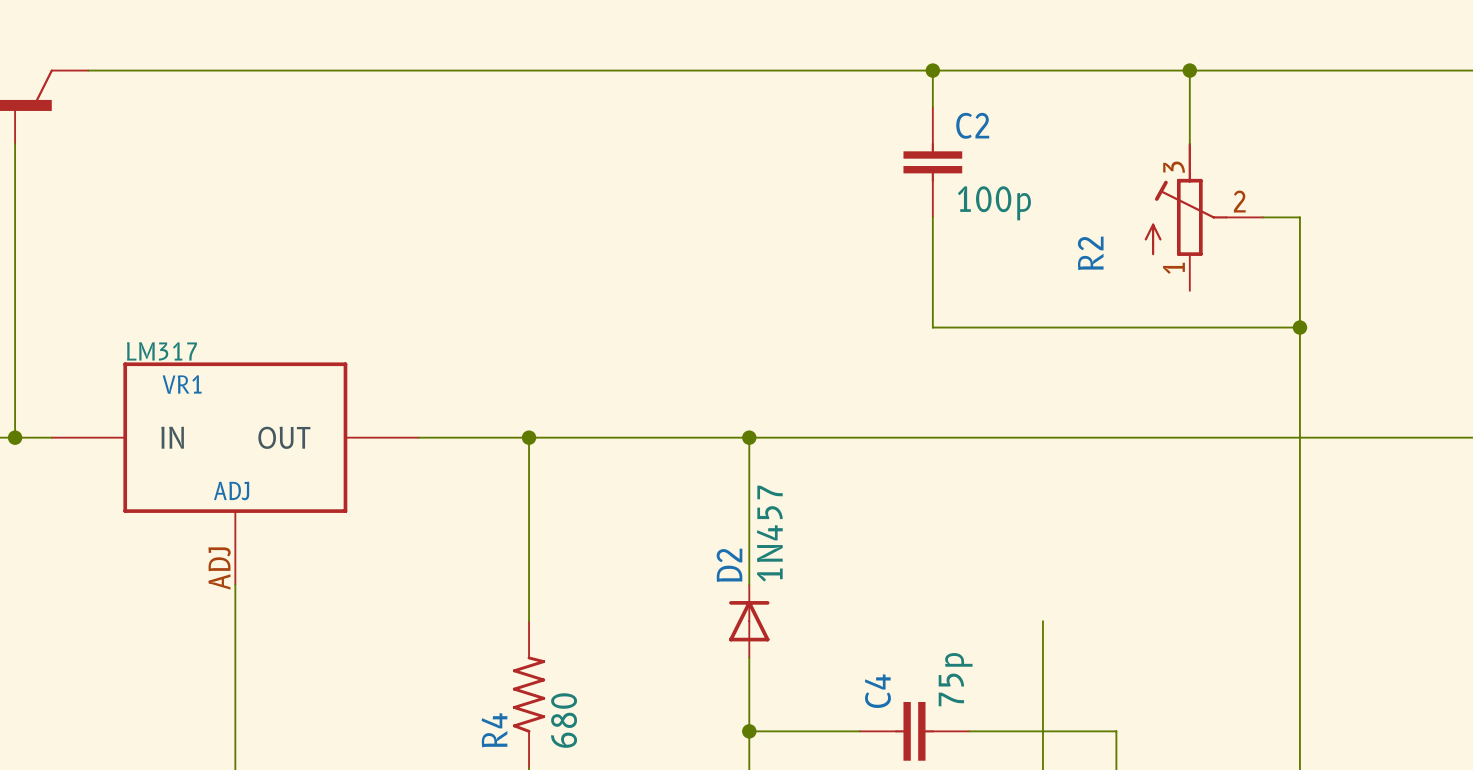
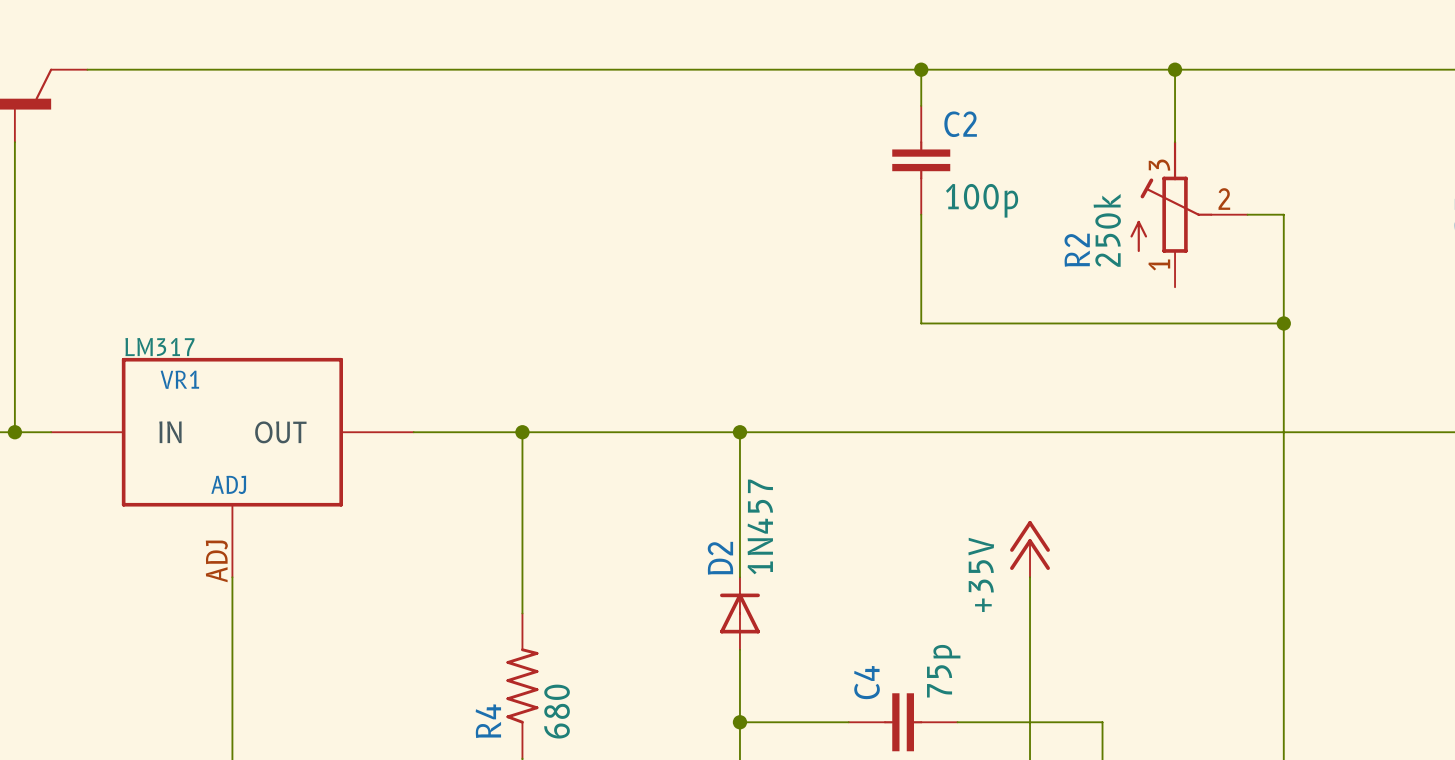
R2 value: none -> 250k (1107, 230)
power symbol: none -> +35V (1030, 549)
wire: none -> (1030, 577) (1030, 613)

